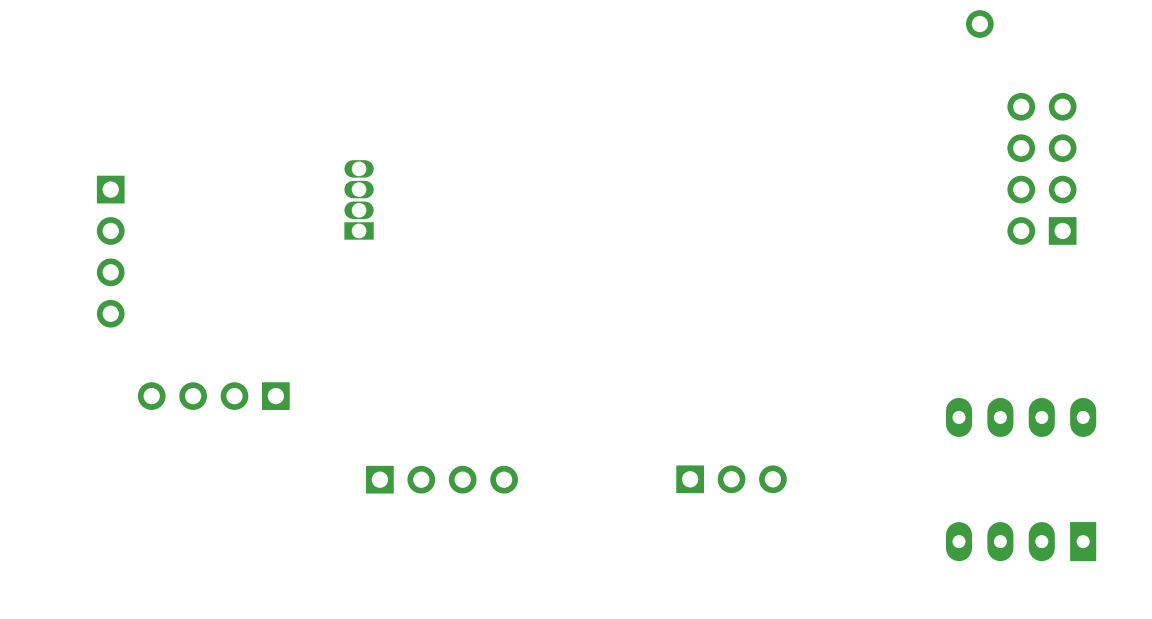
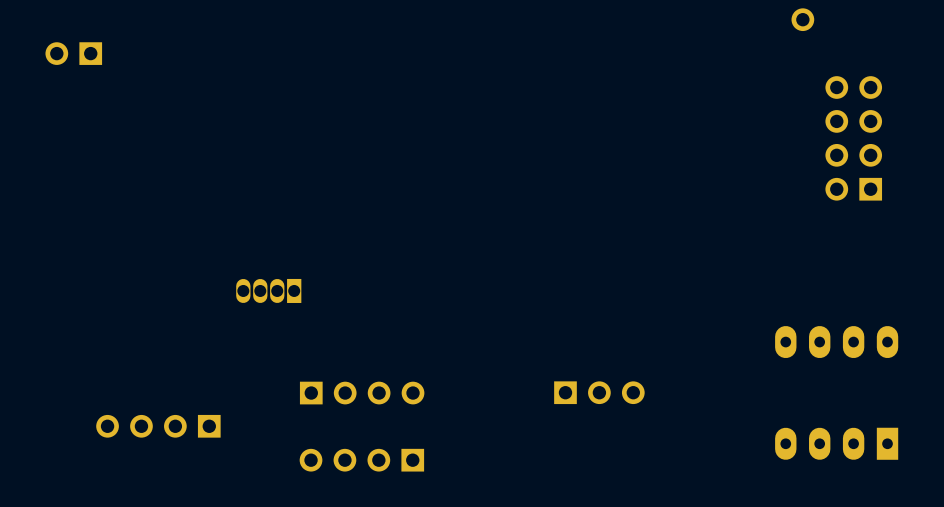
part: none -> (73, 53)
part rotation: 0° (359, 199) -> 90° counterclockwise (268, 290)
part position: (359, 199) -> (268, 290)
part: (110, 251) -> none
part position: (213, 396) -> (158, 426)
part: none -> (361, 460)

